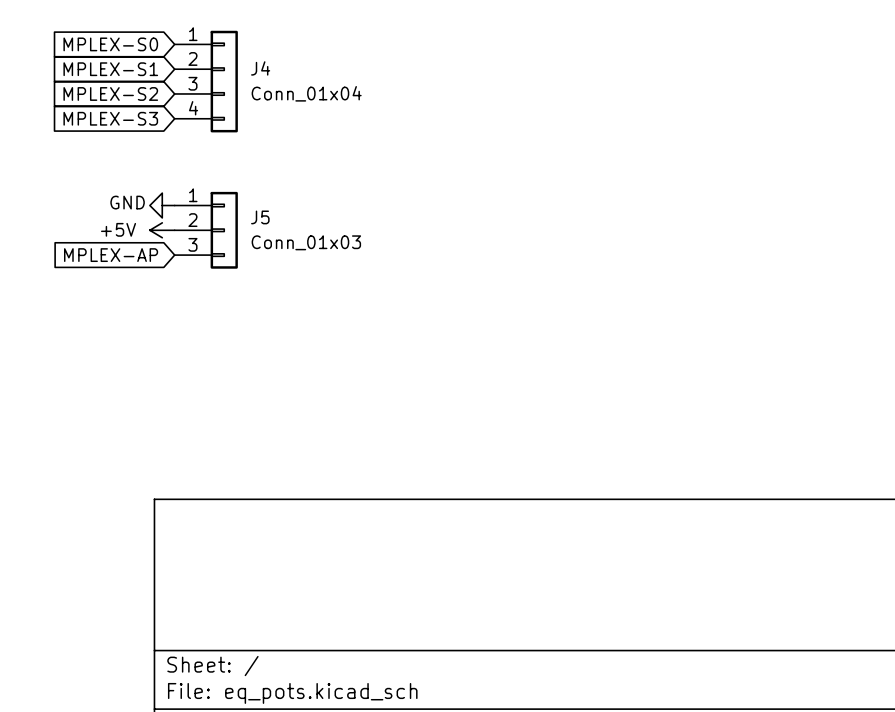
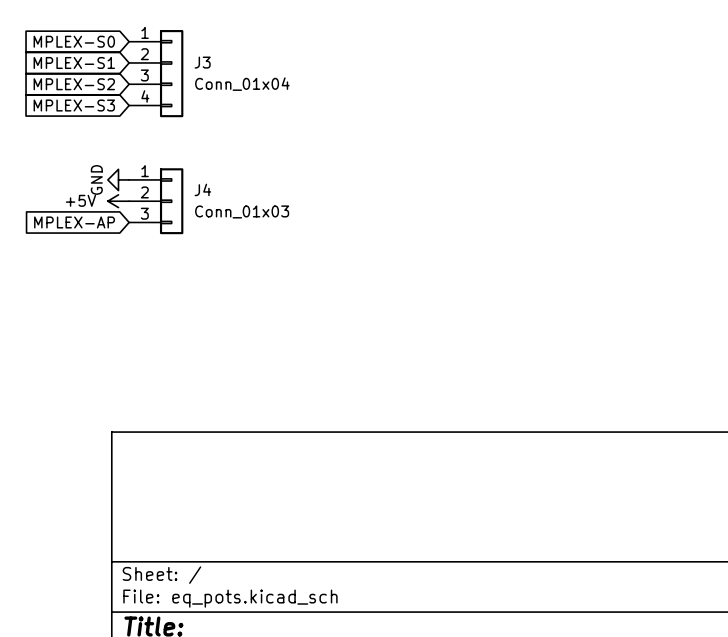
J4 name: J4 (260, 68) -> J3 (202, 62)
power symbol text rotation: 0° (127, 202) -> 90° counterclockwise (96, 179)
J5 name: J5 (260, 217) -> J4 (202, 189)

